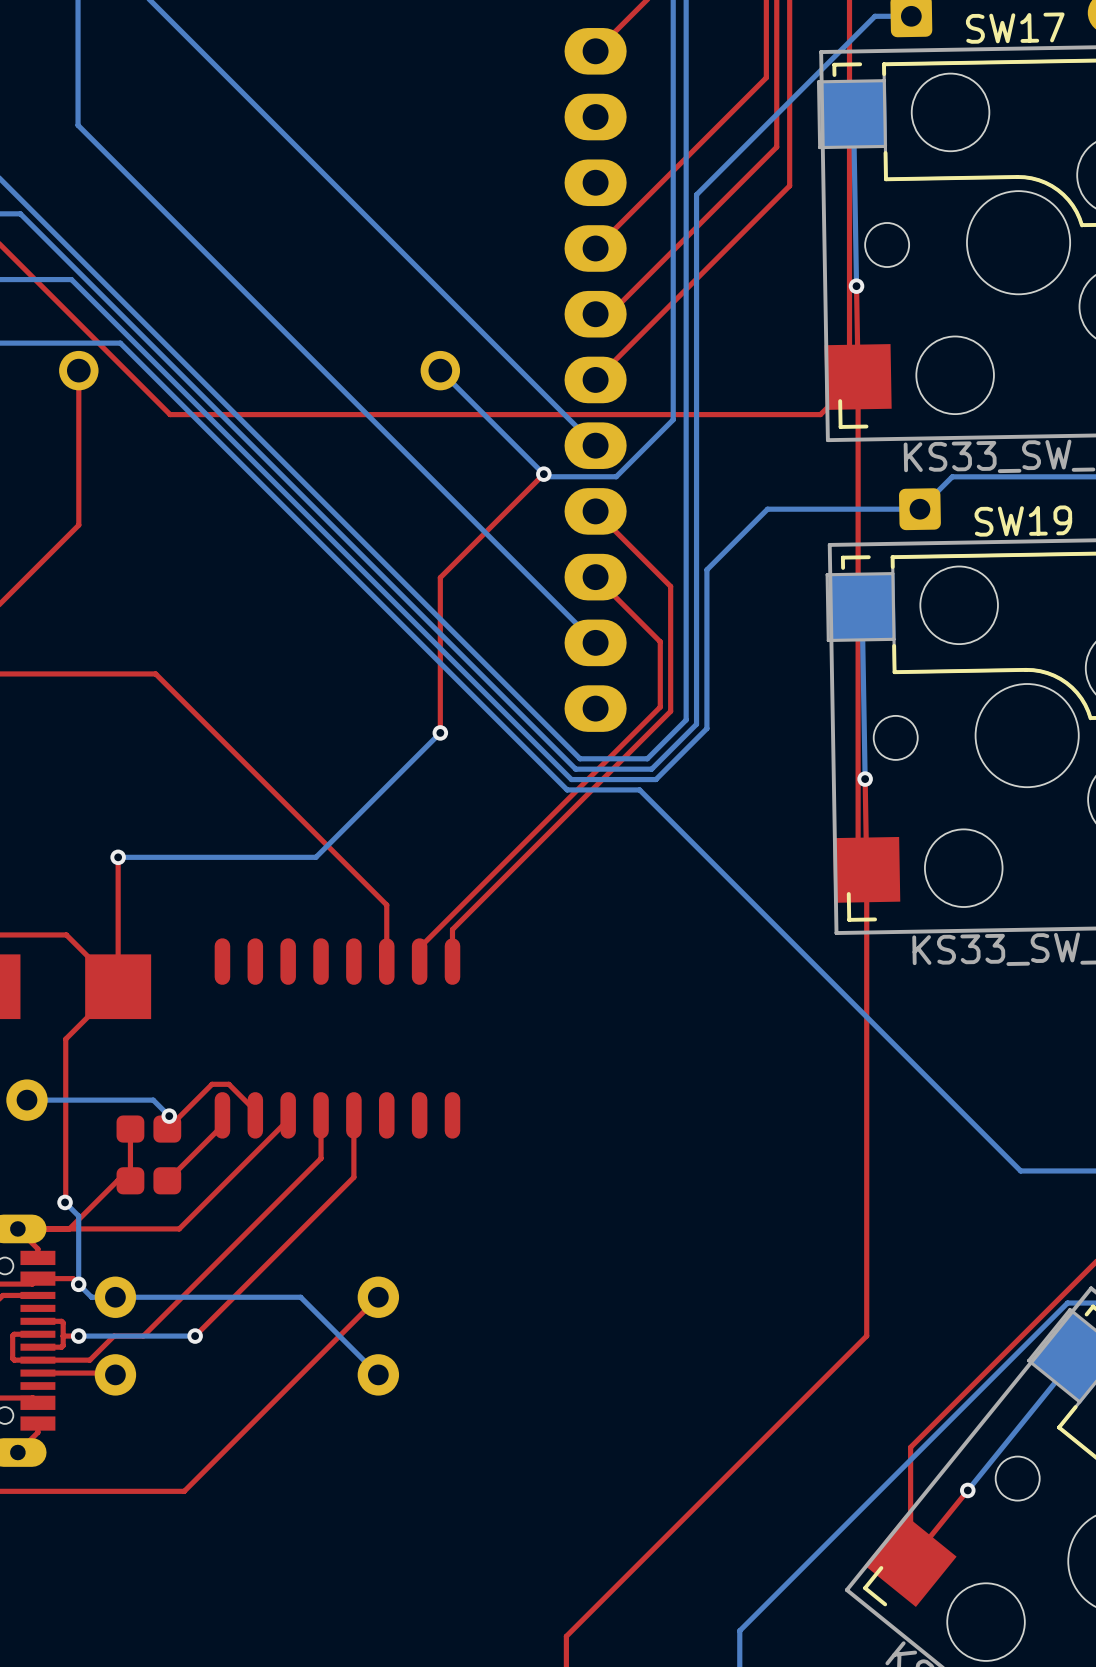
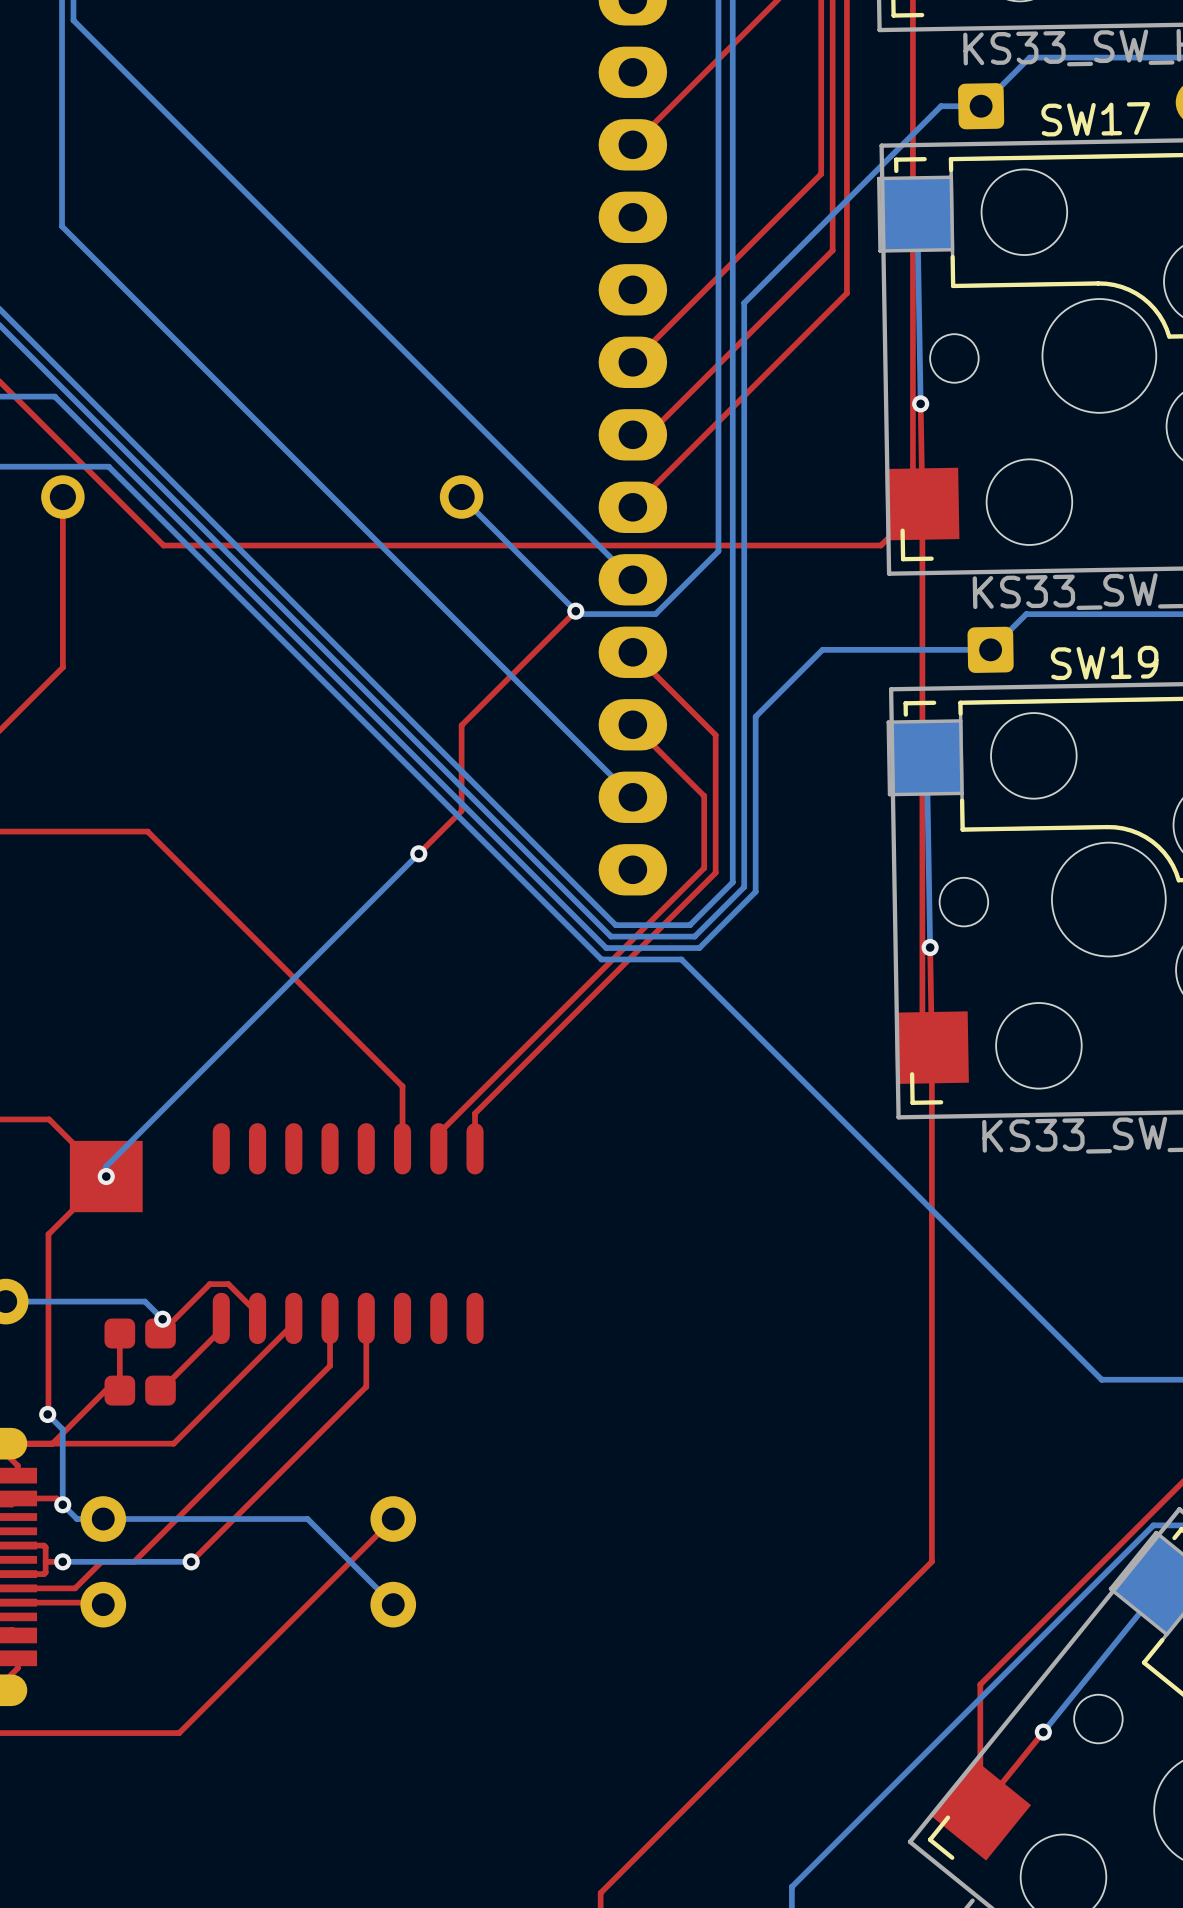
top track: (440, 655) (440, 732) -> (461, 810) (418, 853)
bottom track: none -> (418, 853) (106, 1166) (106, 1176)
via position: (440, 732) -> (418, 853)
bottom track: (440, 733) (315, 857) (118, 857) -> none
top track: (118, 857) (118, 986) -> none
via position: (118, 857) -> (106, 1176)

